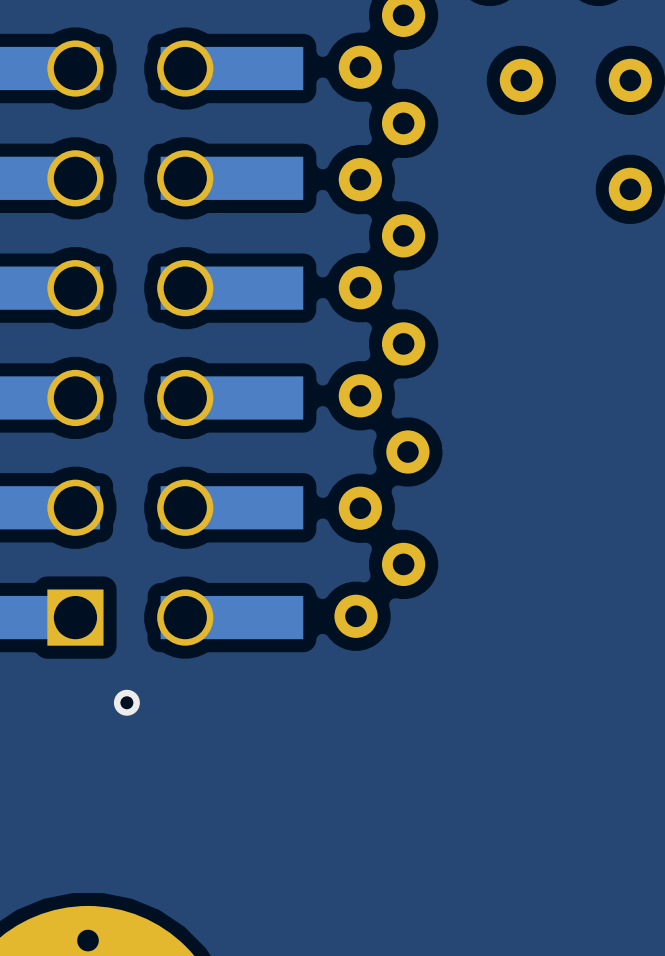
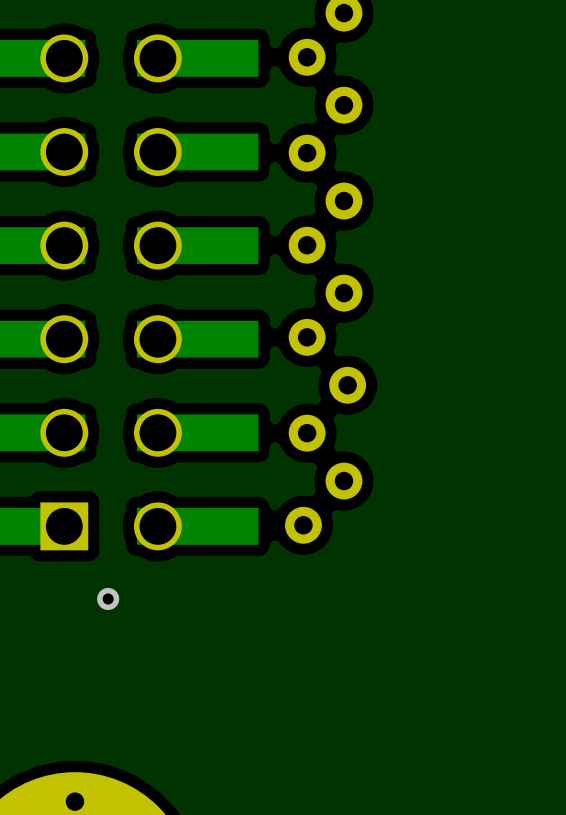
part: (521, 80) -> none
part: (630, 80) -> none
part: (630, 189) -> none

